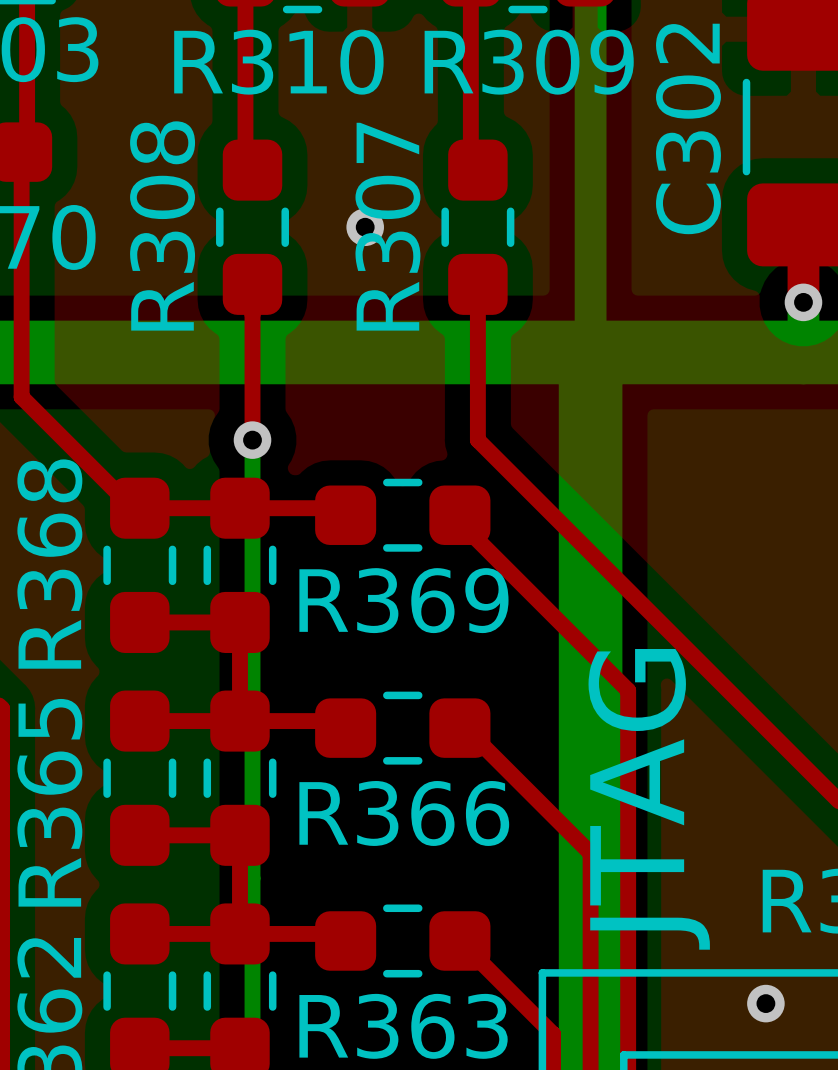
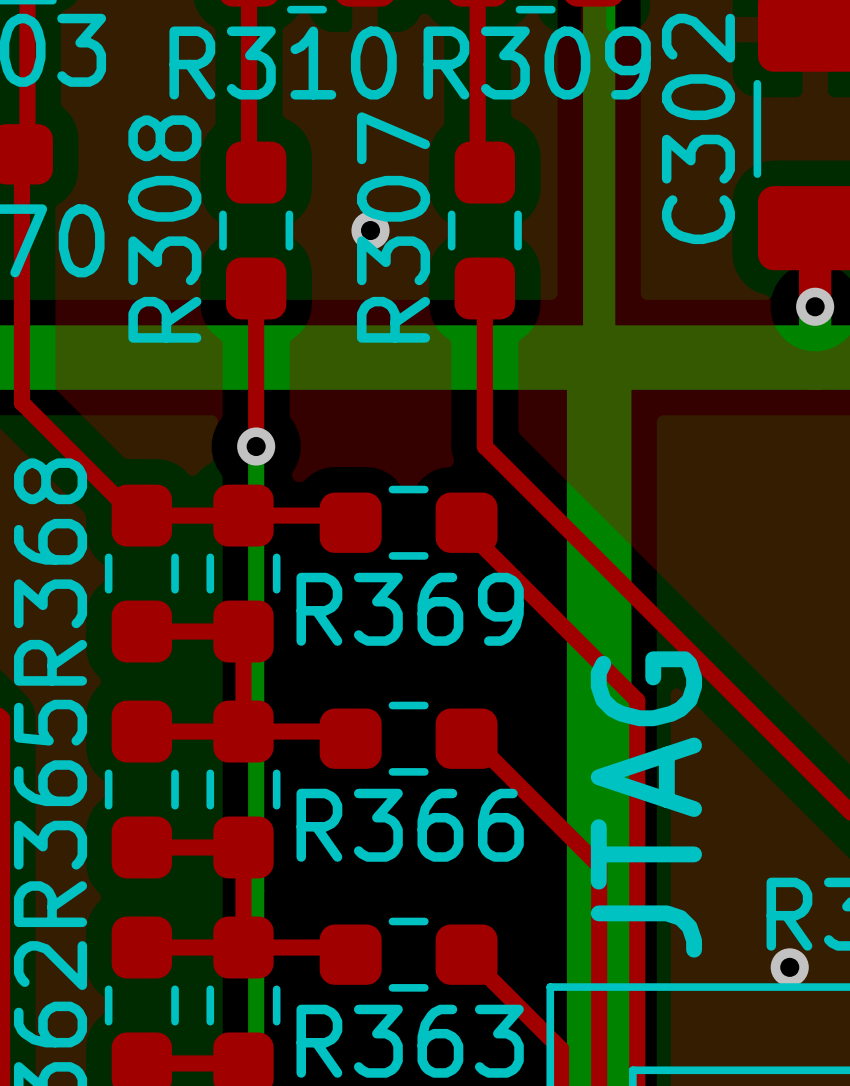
via position: (765, 1003) -> (789, 967)

